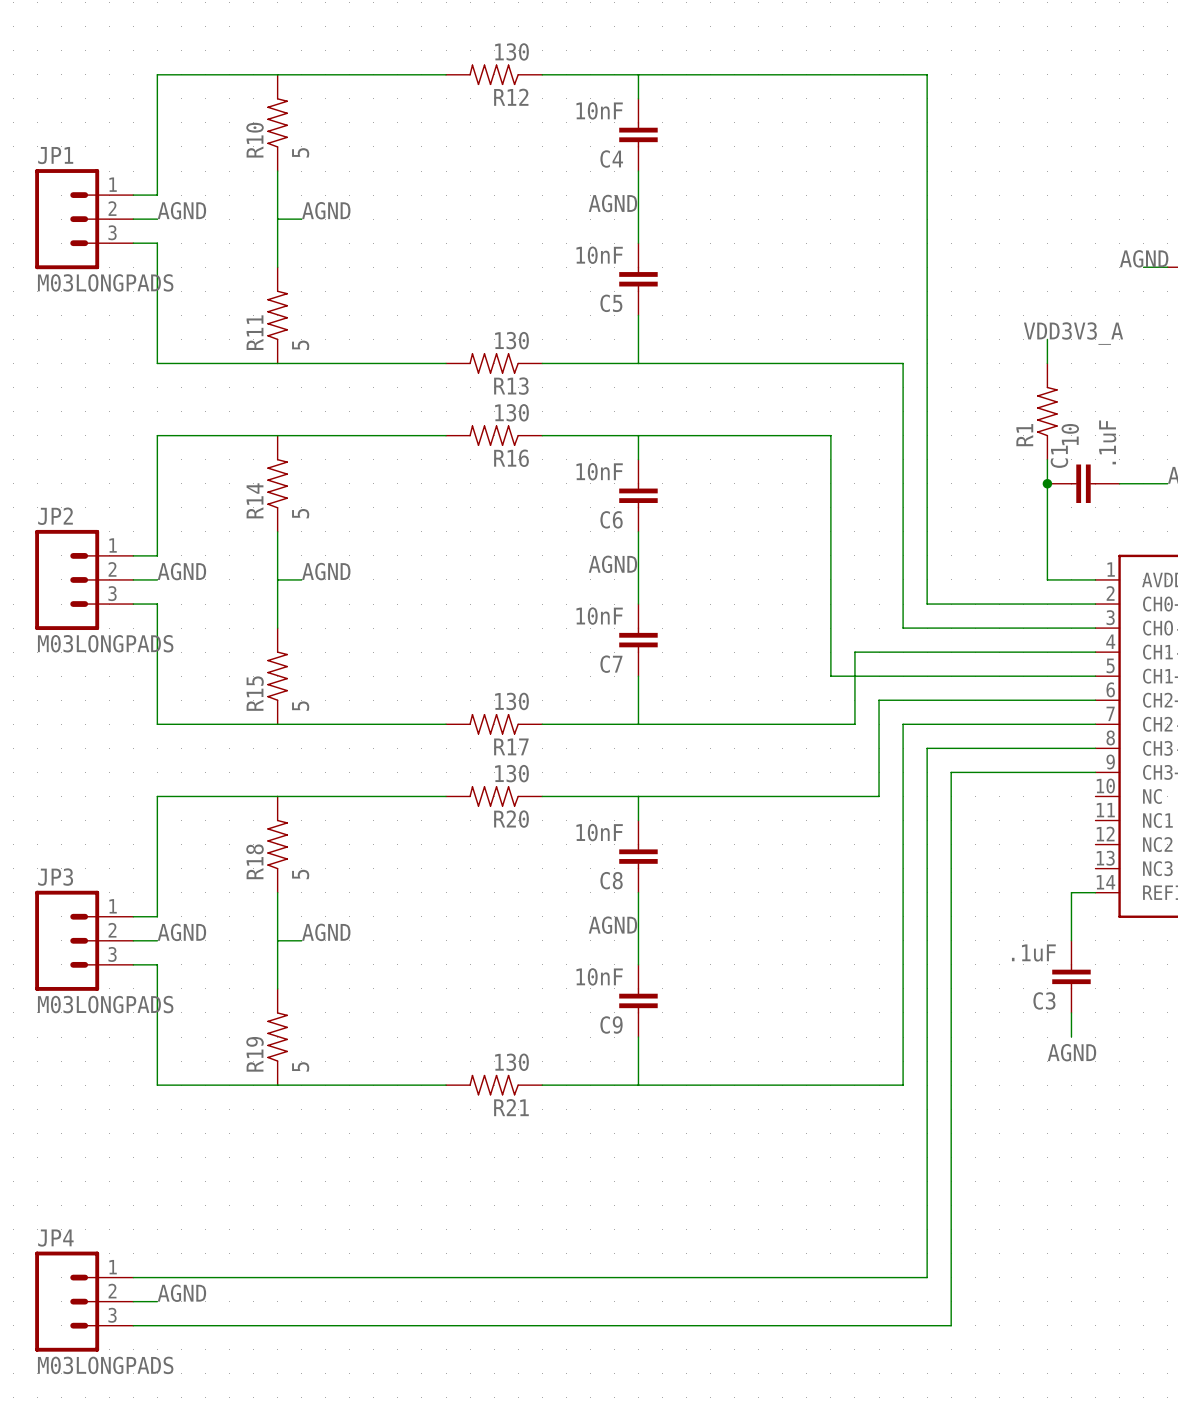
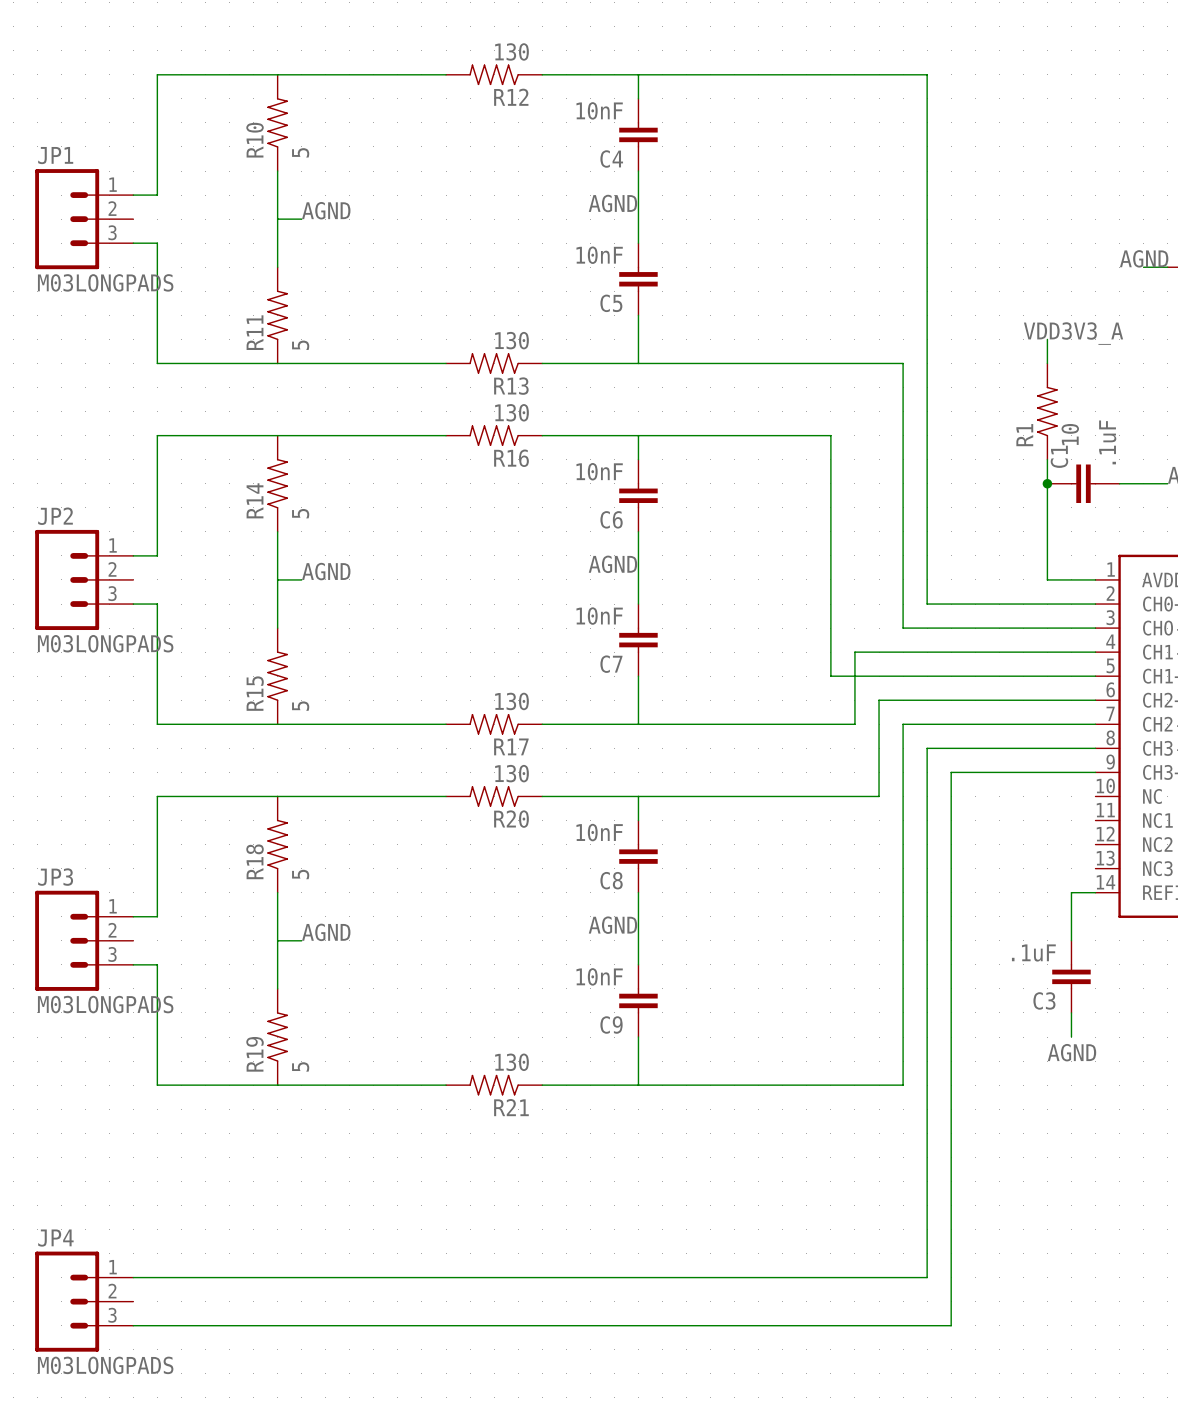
label: AGND (181, 210) -> none
wire: (133, 219) (157, 219) -> none
label: AGND (181, 571) -> none
wire: (133, 579) (157, 579) -> none
label: AGND (181, 932) -> none
wire: (133, 940) (157, 940) -> none
label: AGND (181, 1293) -> none
wire: (133, 1301) (157, 1301) -> none

